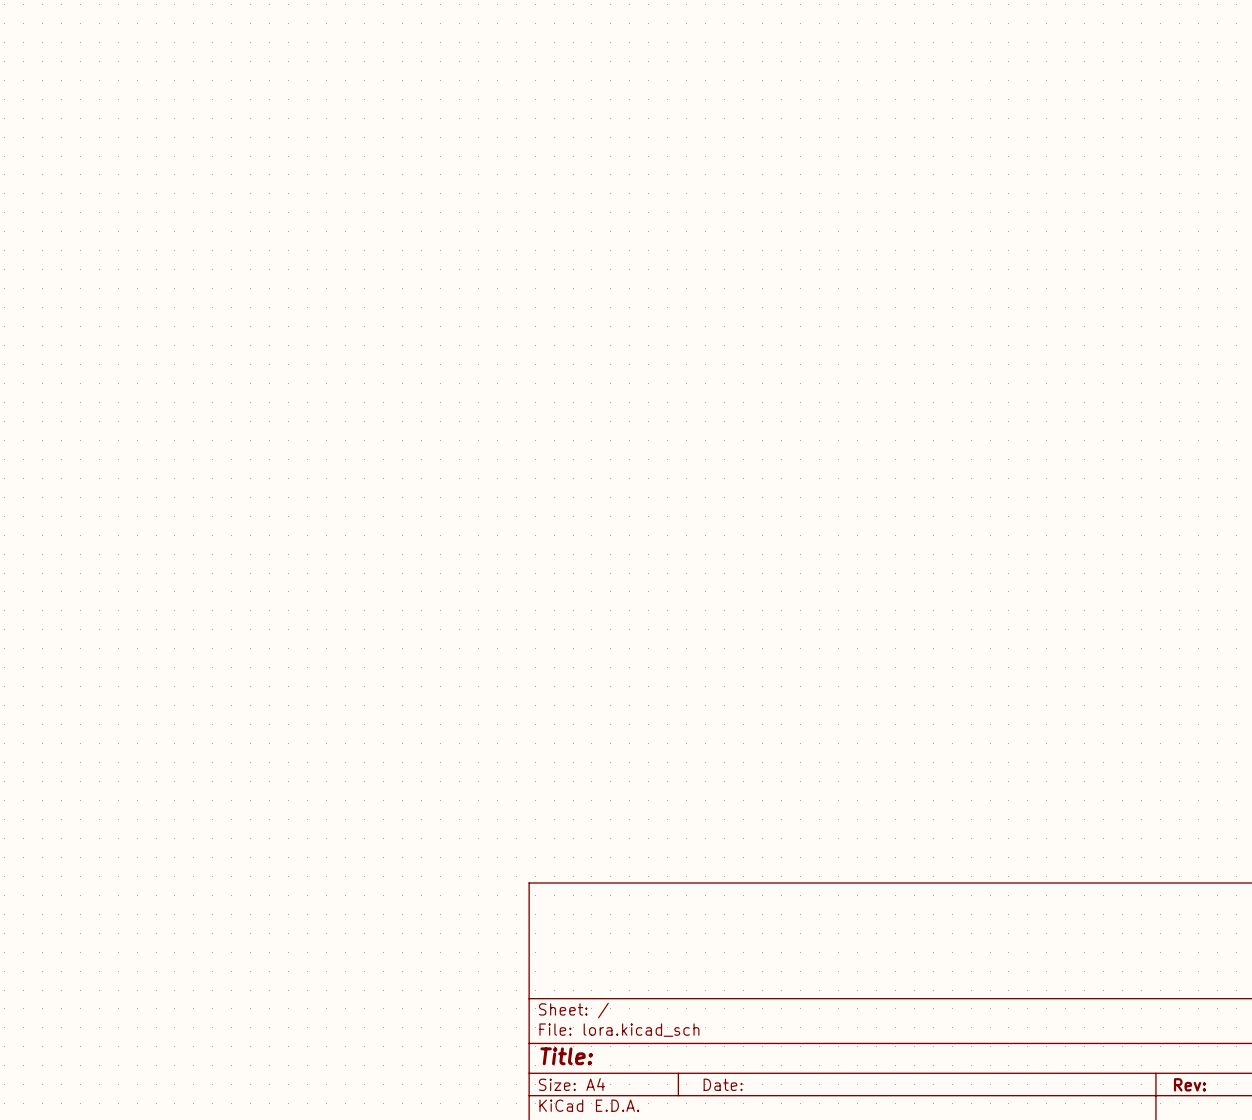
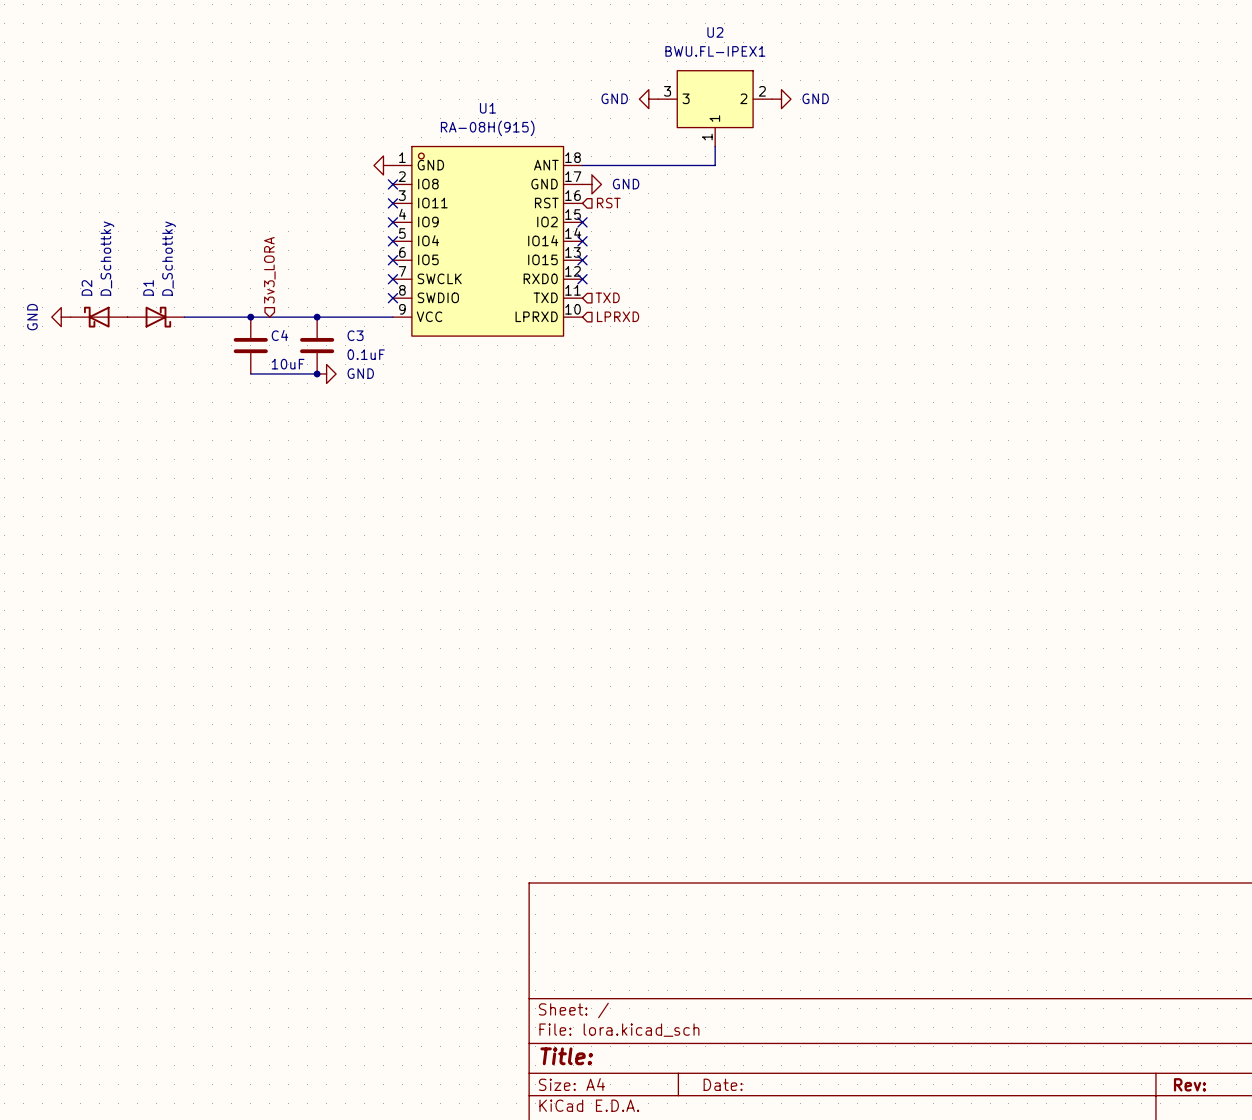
power symbol: none -> GND (648, 99)
power symbol: none -> GND (781, 99)
U2: none -> BWU.FL-IPEX1 (715, 108)
wire: none -> (715, 146) (715, 165) (582, 165)
power symbol: none -> (383, 165)
no-connect mark: none -> (392, 184)
power symbol: none -> GND (591, 184)
no-connect mark: none -> (392, 203)
hierarchical label: none -> RST (608, 203)
no-connect mark: none -> (392, 222)
no-connect mark: none -> (582, 222)
no-connect mark: none -> (392, 241)
U1: none -> RA-08H(915) (487, 241)
no-connect mark: none -> (582, 241)
no-connect mark: none -> (392, 260)
no-connect mark: none -> (582, 260)
hierarchical label: none -> 3v3_LORA (269, 270)
no-connect mark: none -> (392, 279)
no-connect mark: none -> (582, 279)
hierarchical label: none -> TXD (607, 297)
no-connect mark: none -> (392, 298)
hierarchical label: none -> LPRXD (618, 316)
power symbol: none -> GND (61, 317)
D2: none -> D_Schottky (99, 317)
D1: none -> D_Schottky (156, 317)
wire: none -> (184, 317) (392, 317)
junction: none -> (250, 317)
junction: none -> (317, 317)
C4: none -> 10uF (250, 345)
C3: none -> 0.1uF (317, 345)
wire: none -> (250, 373) (317, 373)
junction: none -> (317, 373)
power symbol: none -> GND (326, 373)

